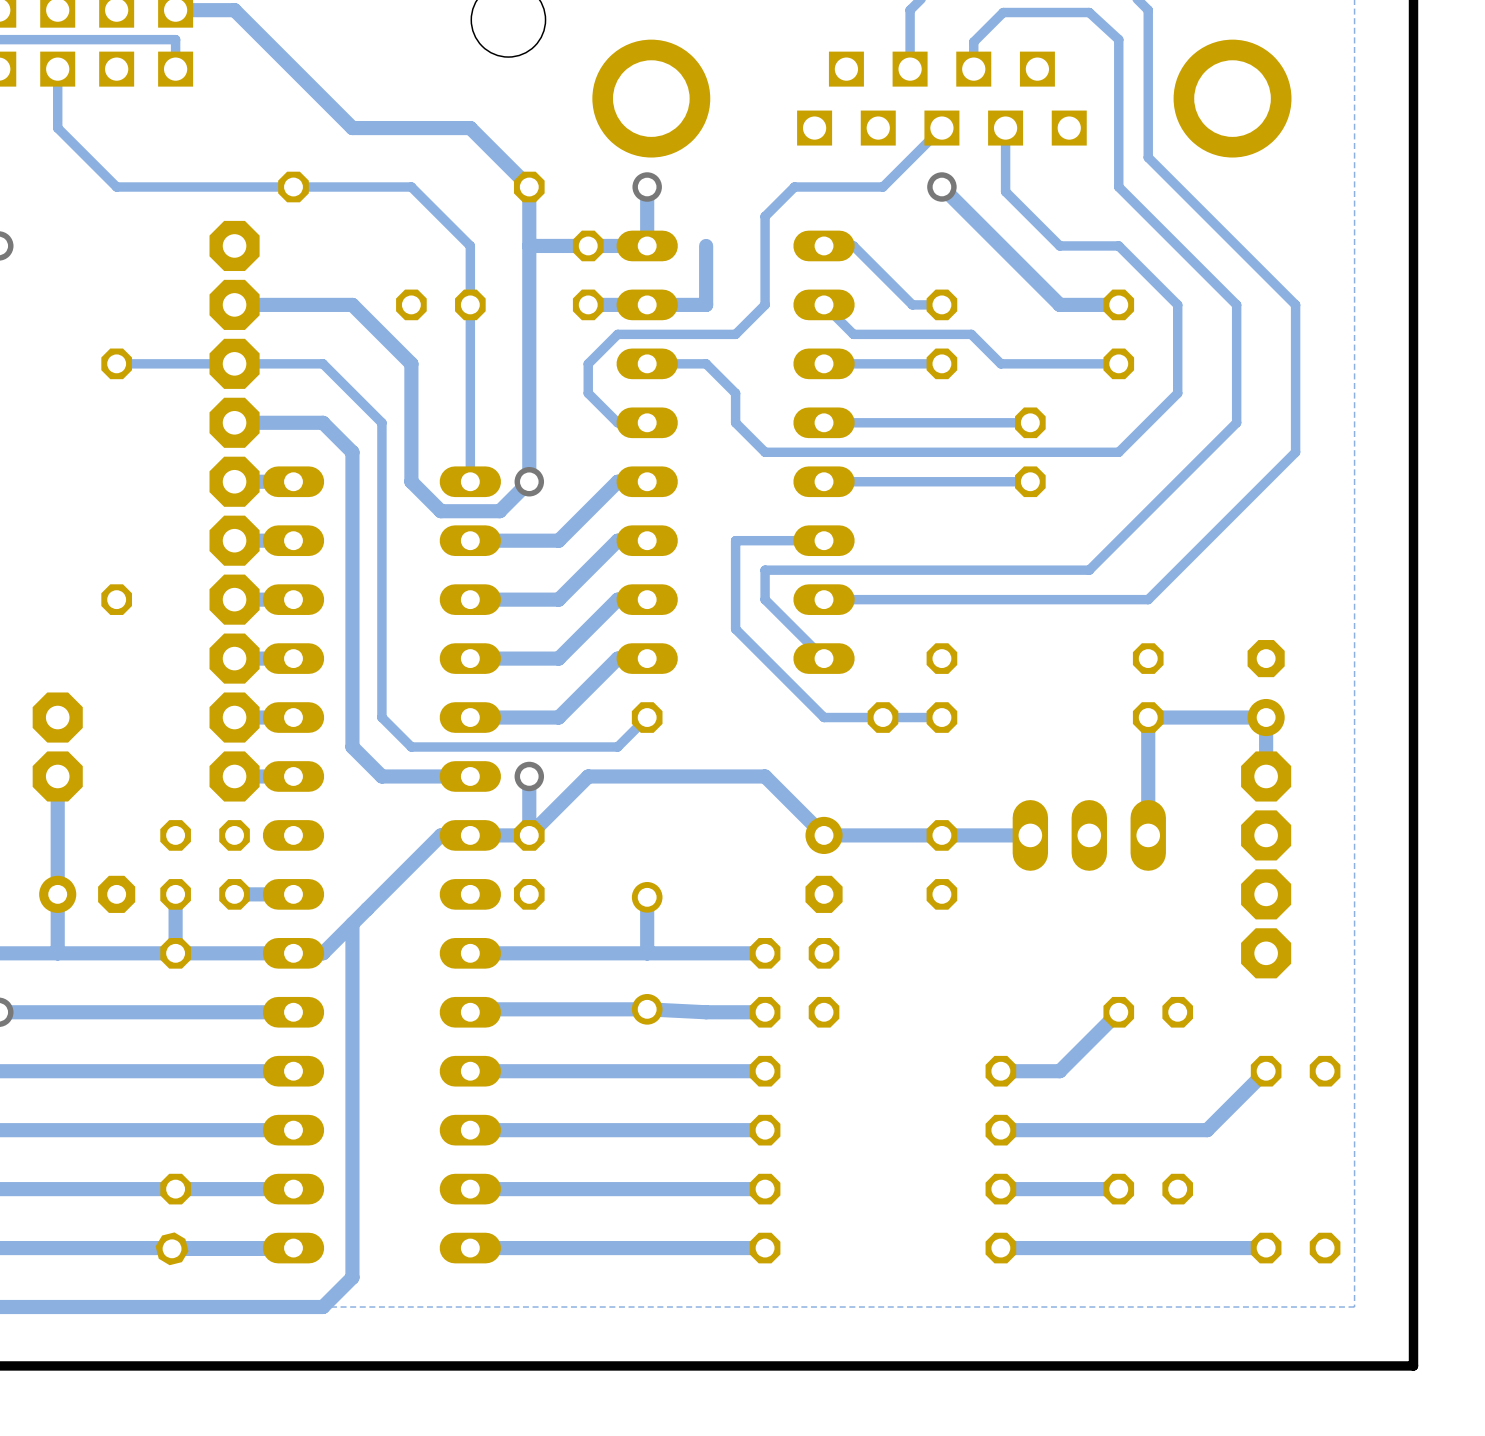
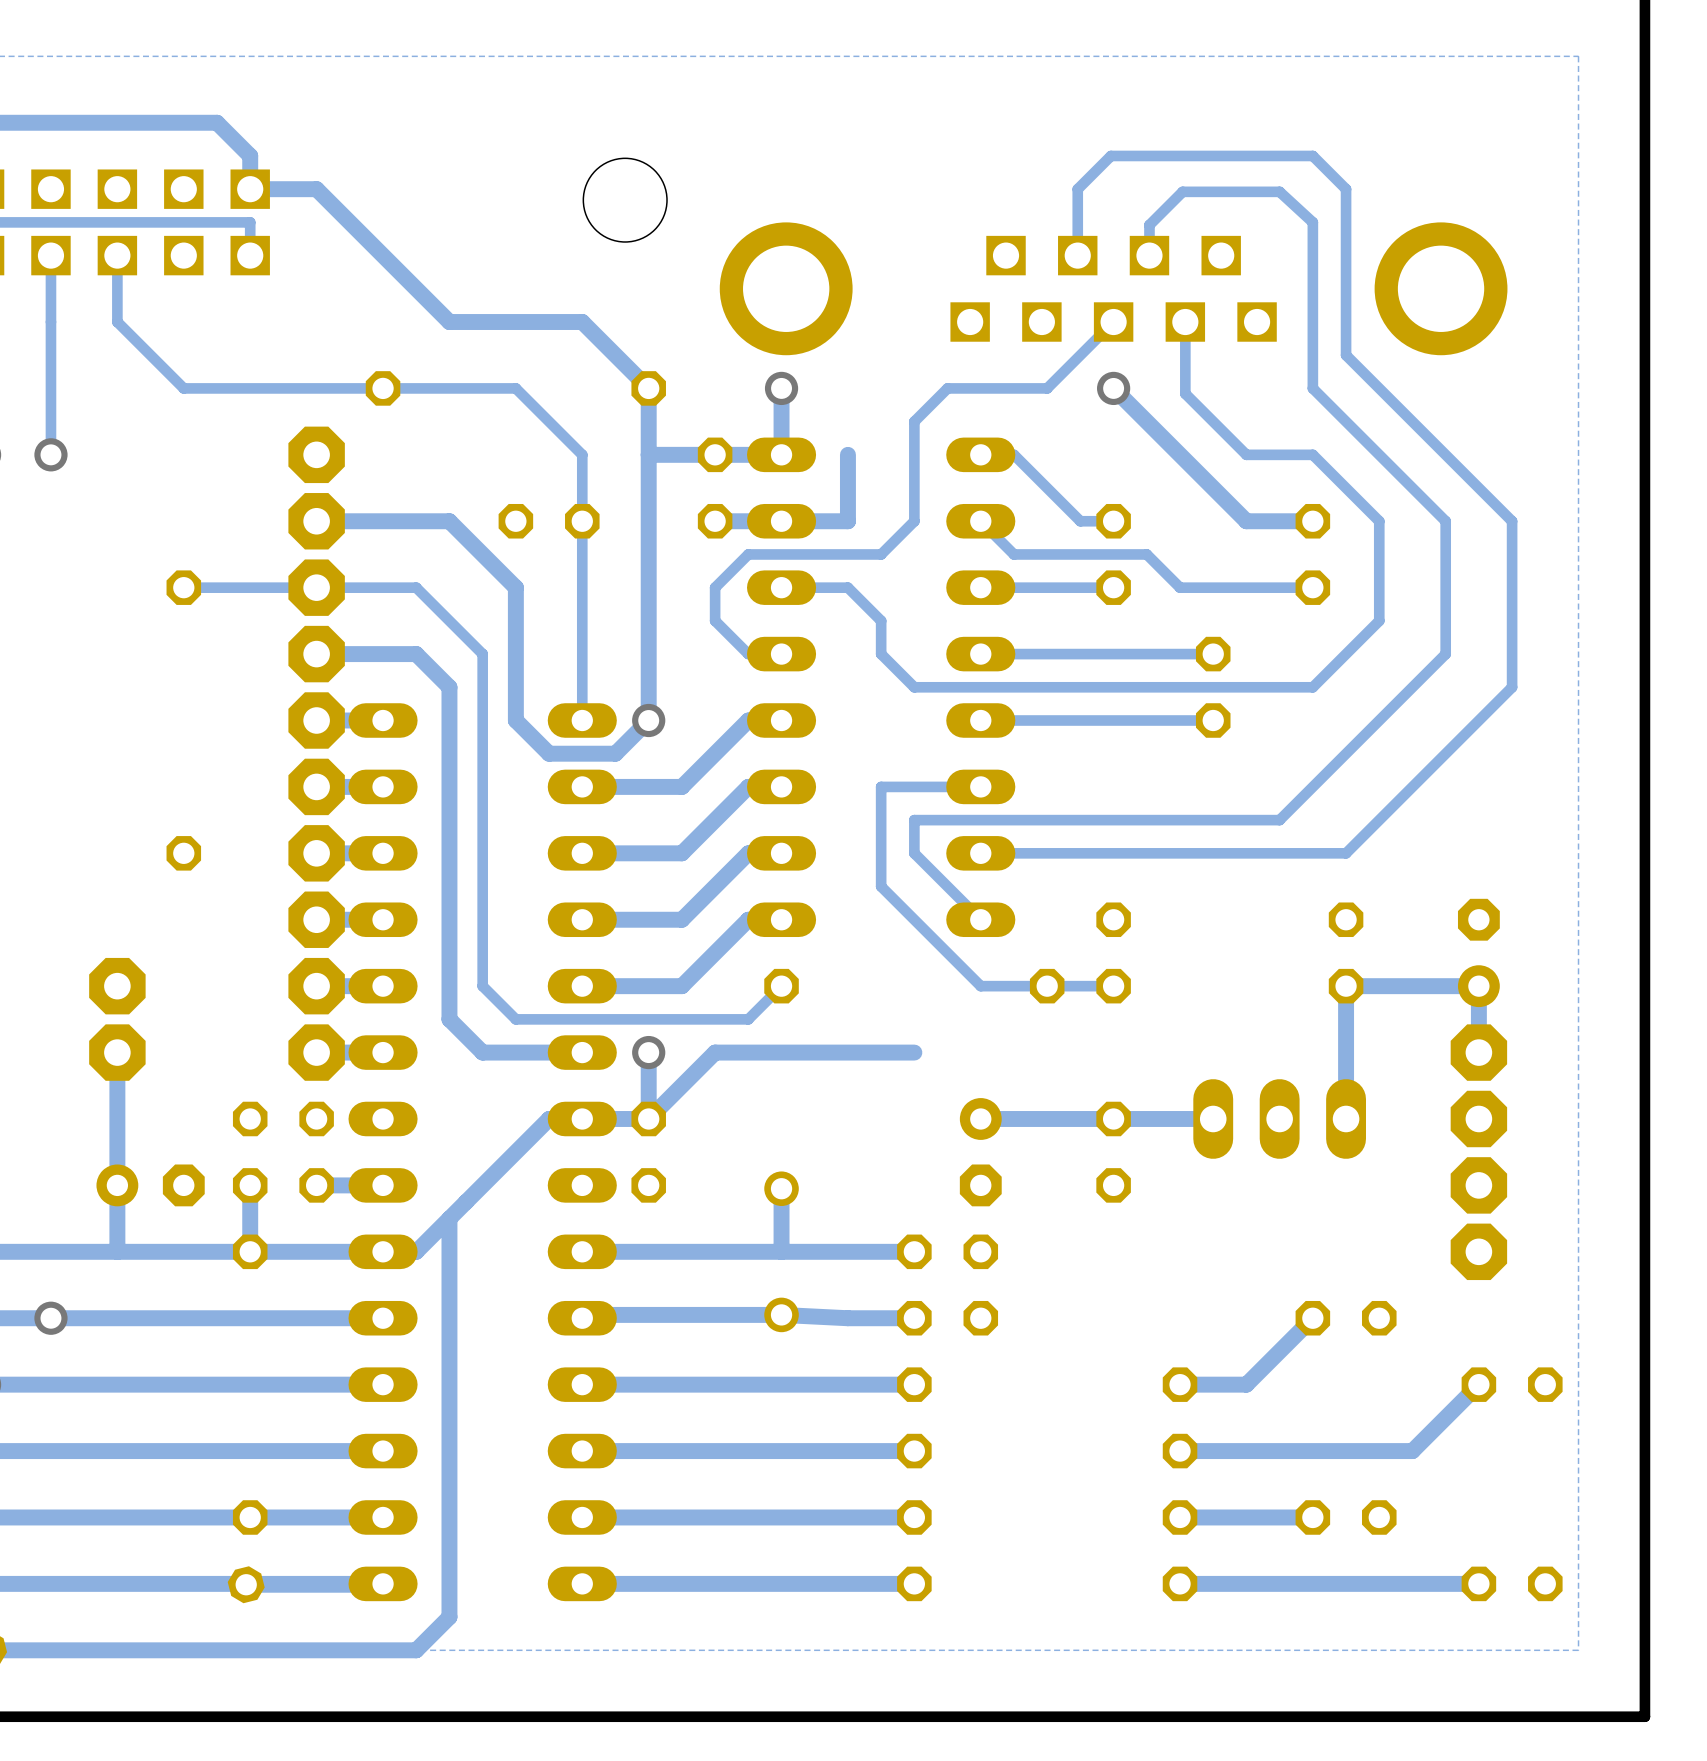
track: (765, 776) (824, 835) -> none

